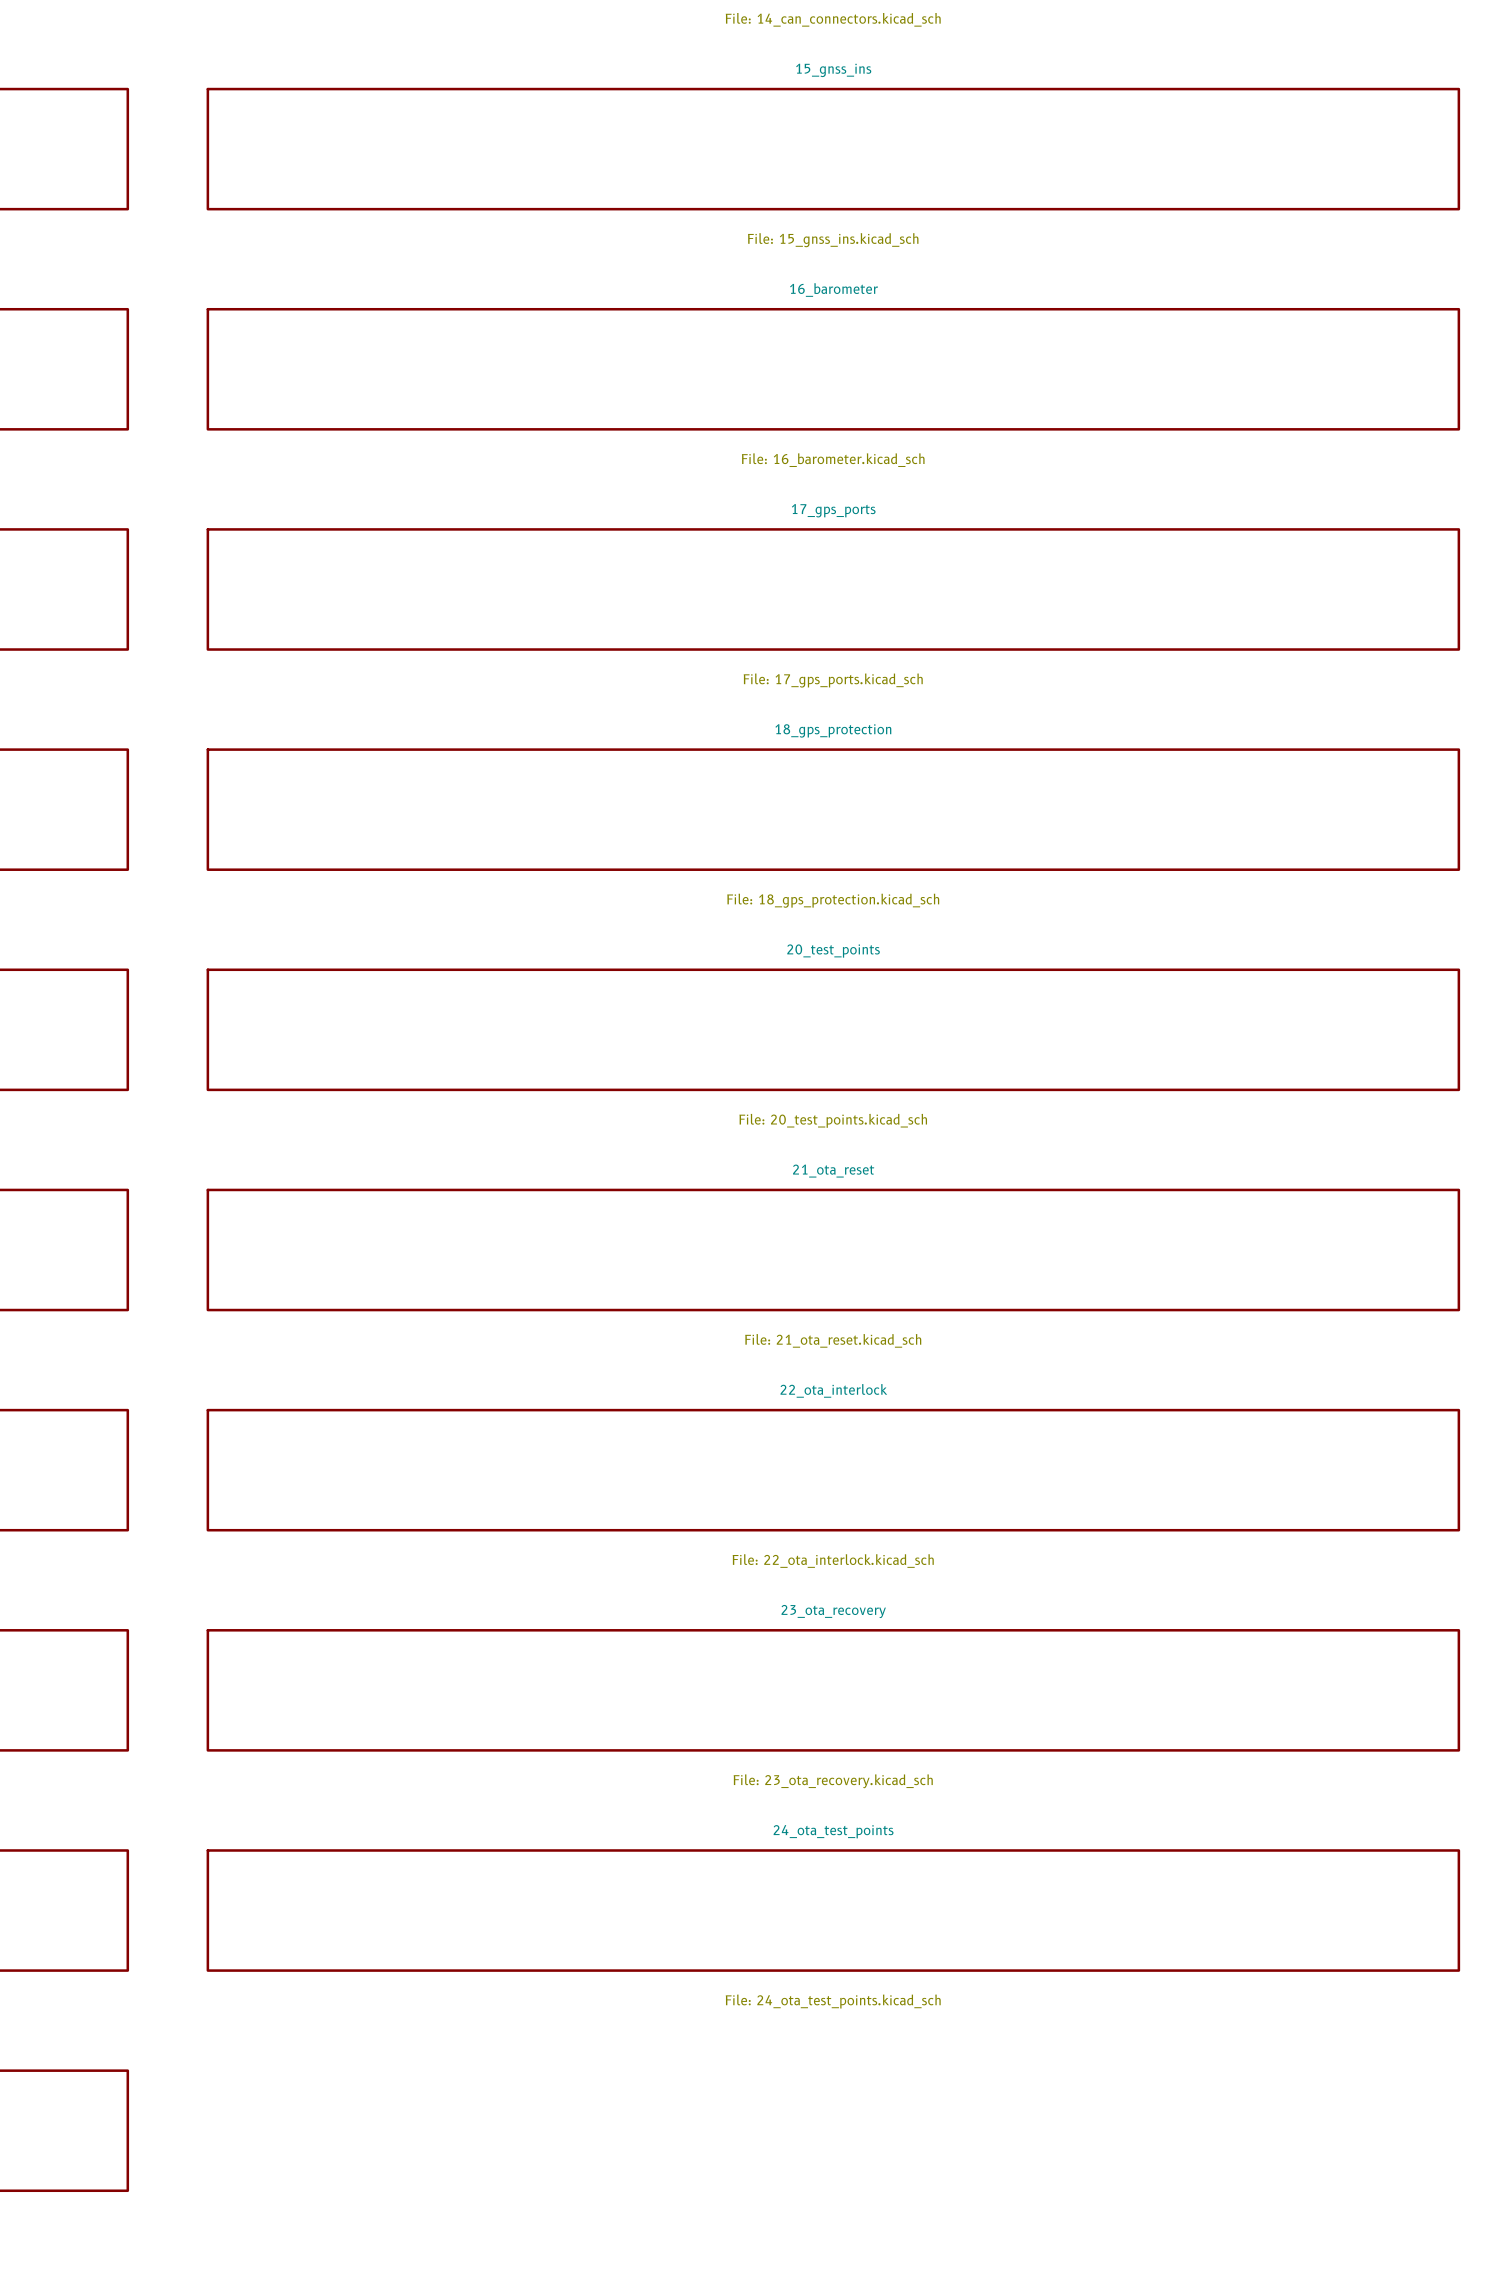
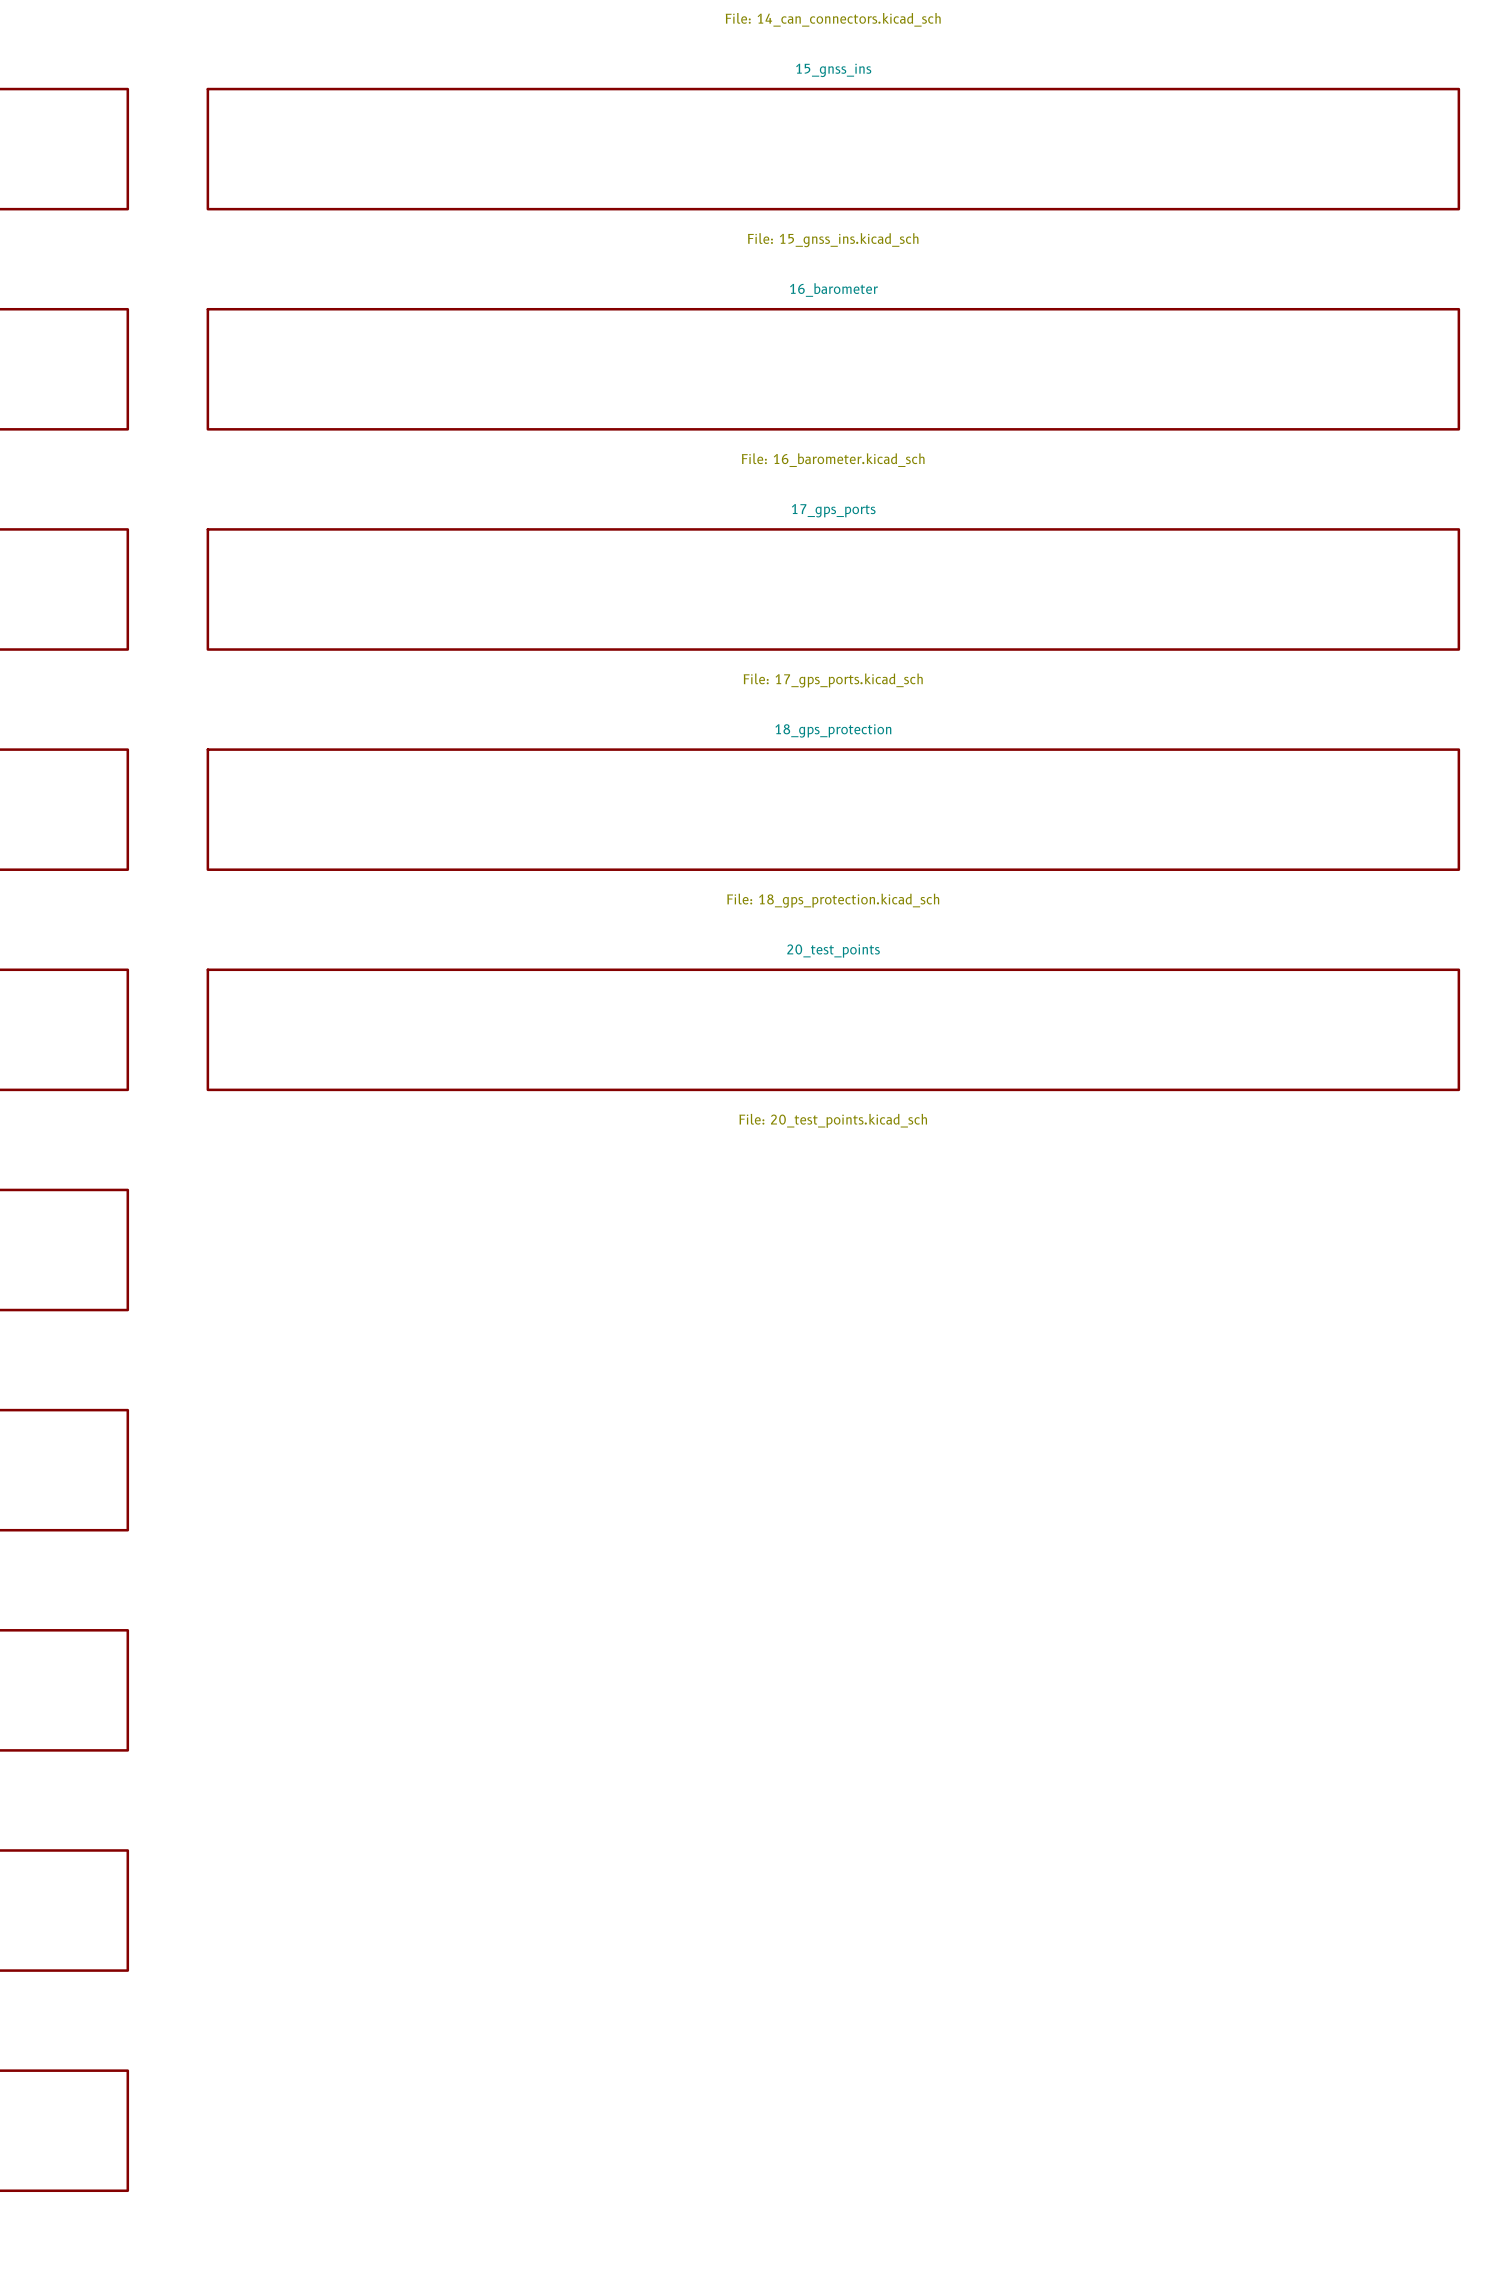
sheet 21_ota_reset: File: 21_ota_reset.kicad_sch (833, 1250) -> none
sheet 22_ota_interlock: File: 22_ota_interlock.kicad_sch (833, 1470) -> none
sheet 23_ota_recovery: File: 23_ota_recovery.kicad_sch (833, 1690) -> none
sheet 24_ota_test_points: File: 24_ota_test_points.kicad_sch (833, 1910) -> none

